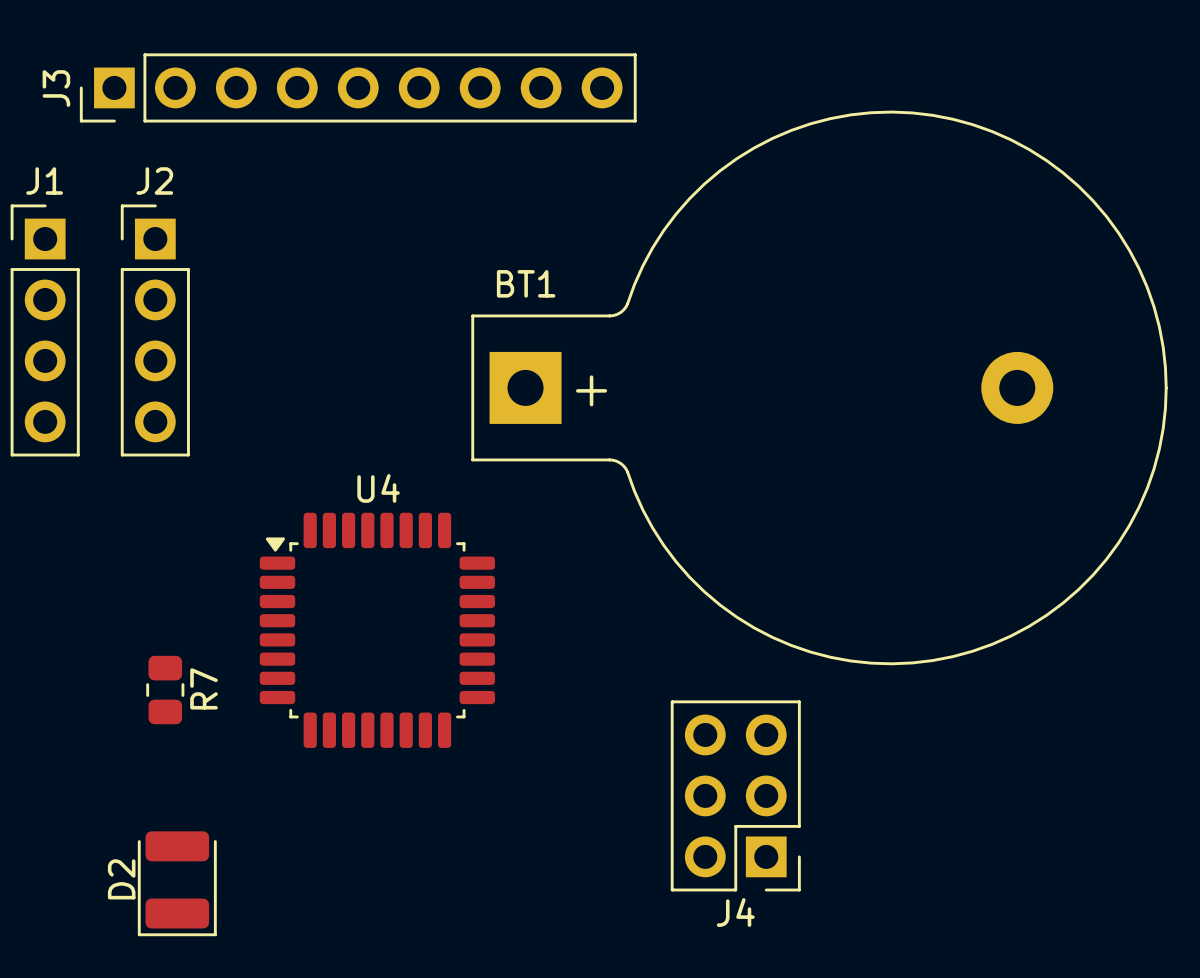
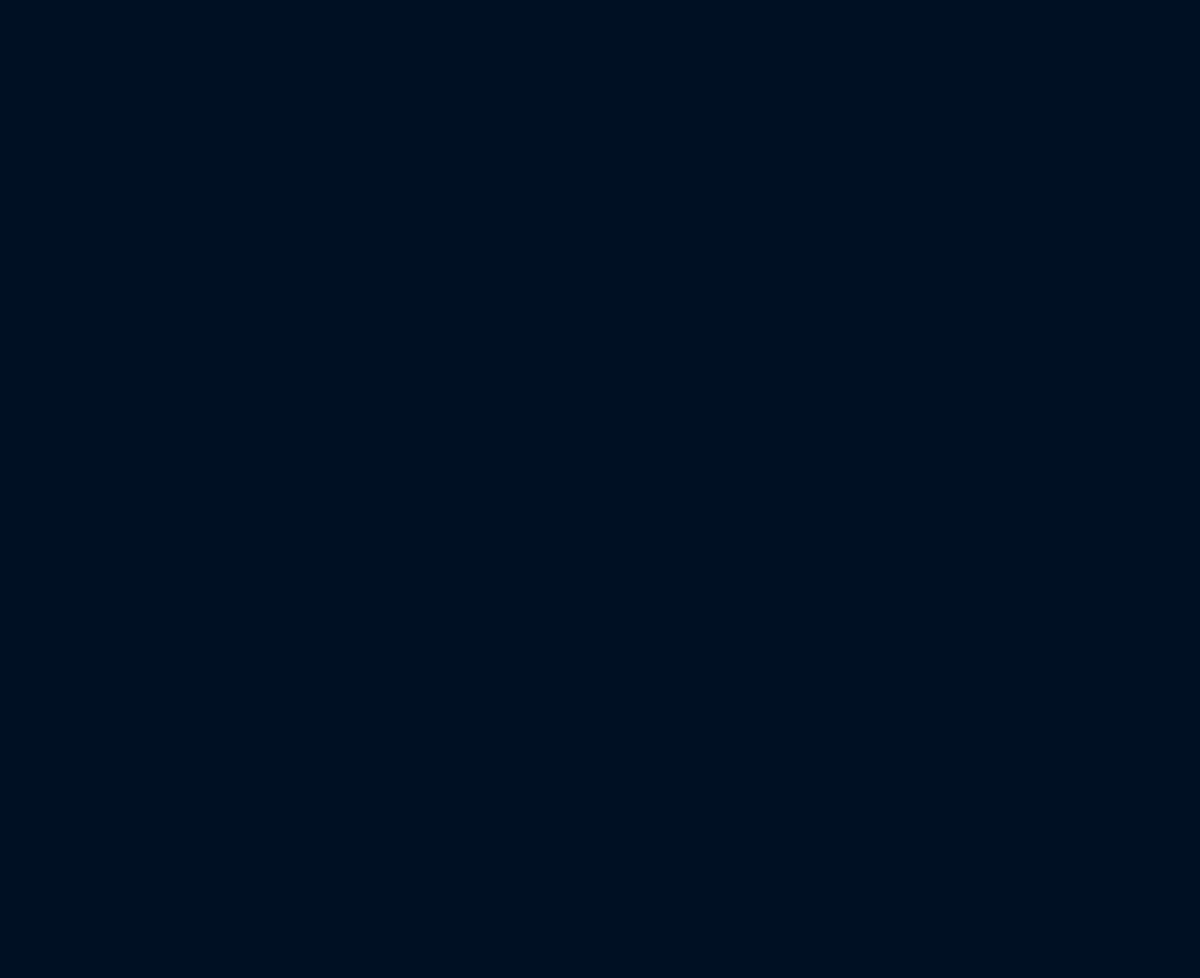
J3: (358, 87) -> none
J1: (45, 330) -> none
J2: (155, 330) -> none
BT1: (819, 387) -> none
U4: (377, 630) -> none
R7: (165, 690) -> none
J4: (735, 795) -> none
D2: (177, 883) -> none

